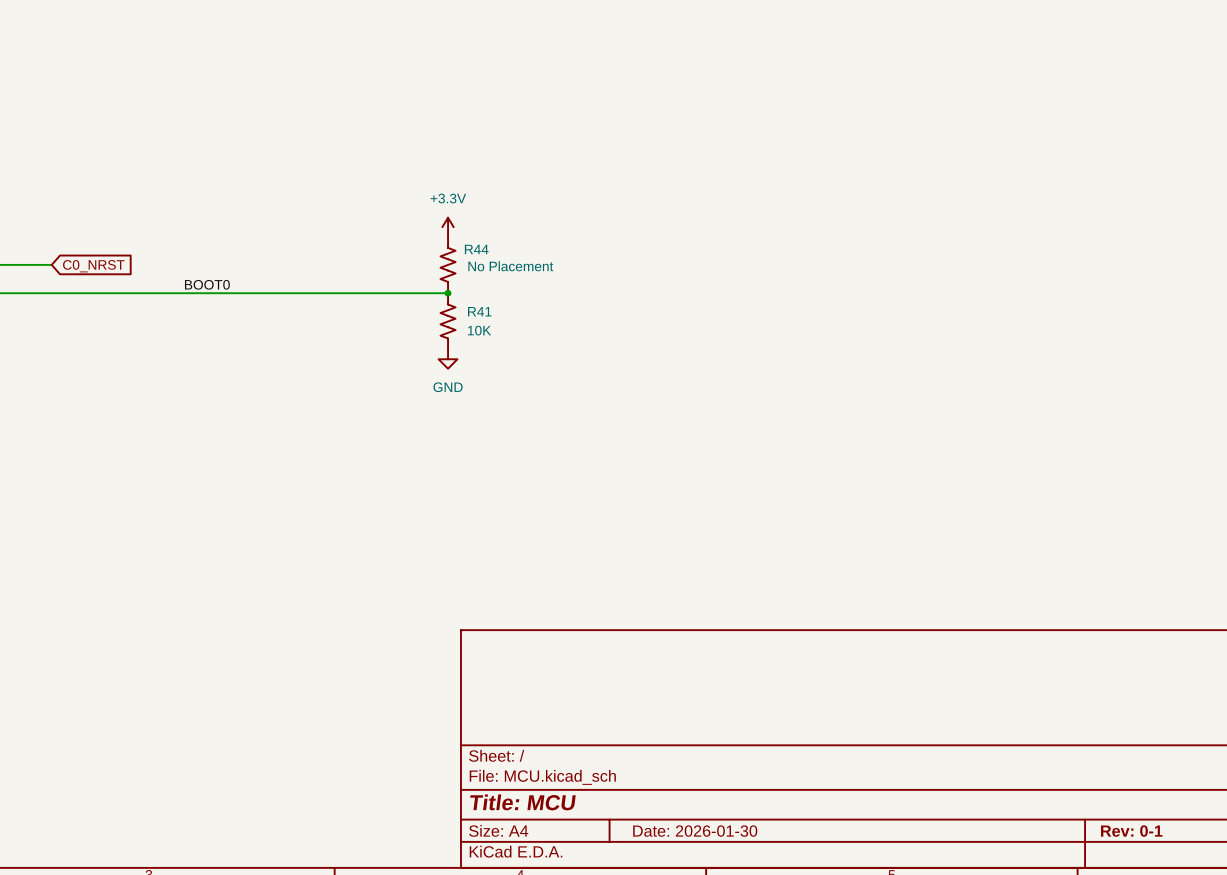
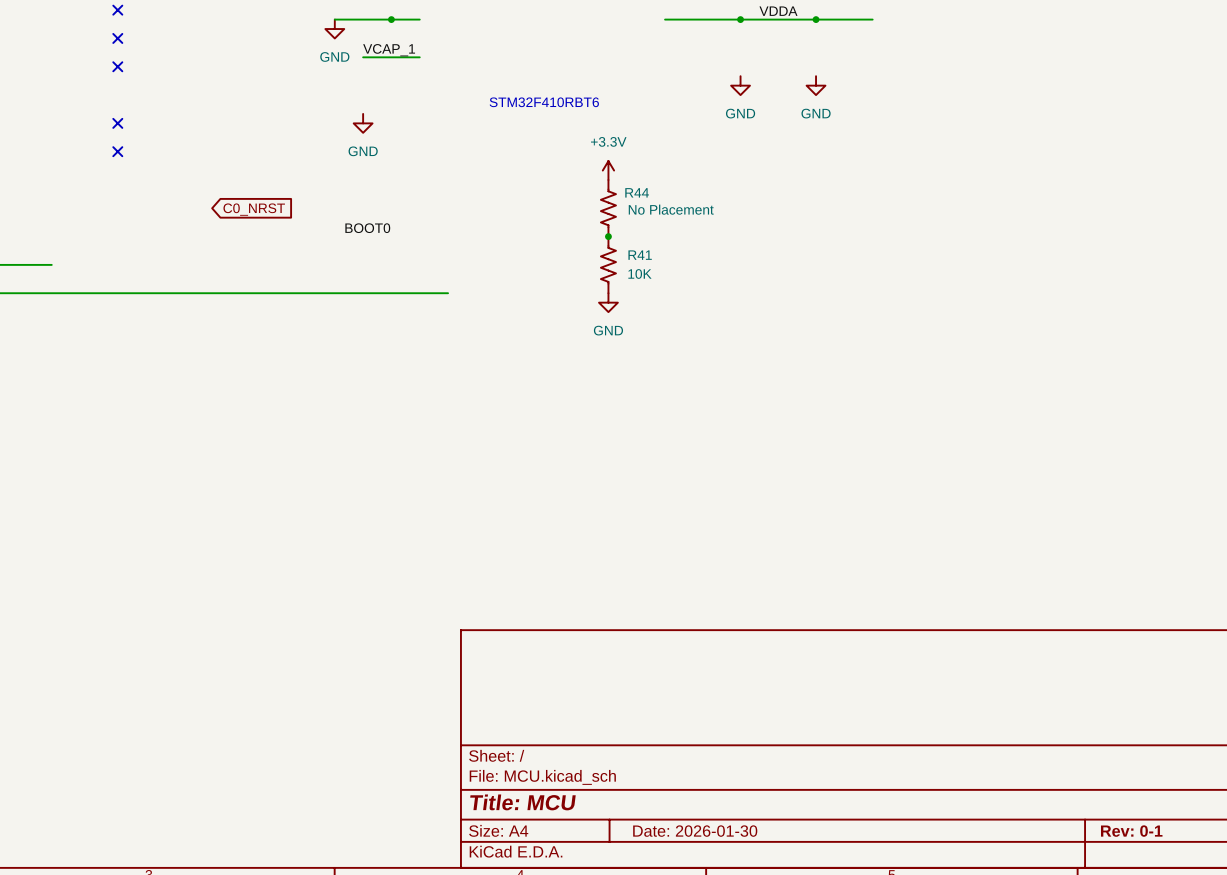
no-connect mark: none -> (117, 10)
label: none -> VDDA (778, 11)
wire: none -> (334, 19) (419, 19)
junction: none -> (391, 19)
wire: none -> (665, 19) (872, 19)
junction: none -> (740, 19)
junction: none -> (816, 19)
power symbol: none -> GND (334, 29)
no-connect mark: none -> (117, 38)
label: none -> VCAP_1 (389, 50)
wire: none -> (363, 57) (419, 57)
no-connect mark: none -> (117, 66)
power symbol: none -> GND (740, 85)
power symbol: none -> GND (816, 85)
text: none -> STM32F410RBT6 (544, 102)
no-connect mark: none -> (117, 123)
power symbol: none -> GND (363, 123)
no-connect mark: none -> (117, 151)
power symbol position: +3.3V (448, 227) -> +3.3V (608, 170)
junction: none -> (608, 236)
R44 position: (448, 264) -> (608, 208)
global label position: C0_NRST (93, 266) -> C0_NRST (254, 209)
label position: BOOT0 (207, 284) -> BOOT0 (367, 228)
junction: (448, 293) -> none
power symbol: none -> GND (608, 302)
R41 position: (448, 321) -> (608, 264)
power symbol: GND (448, 359) -> none

